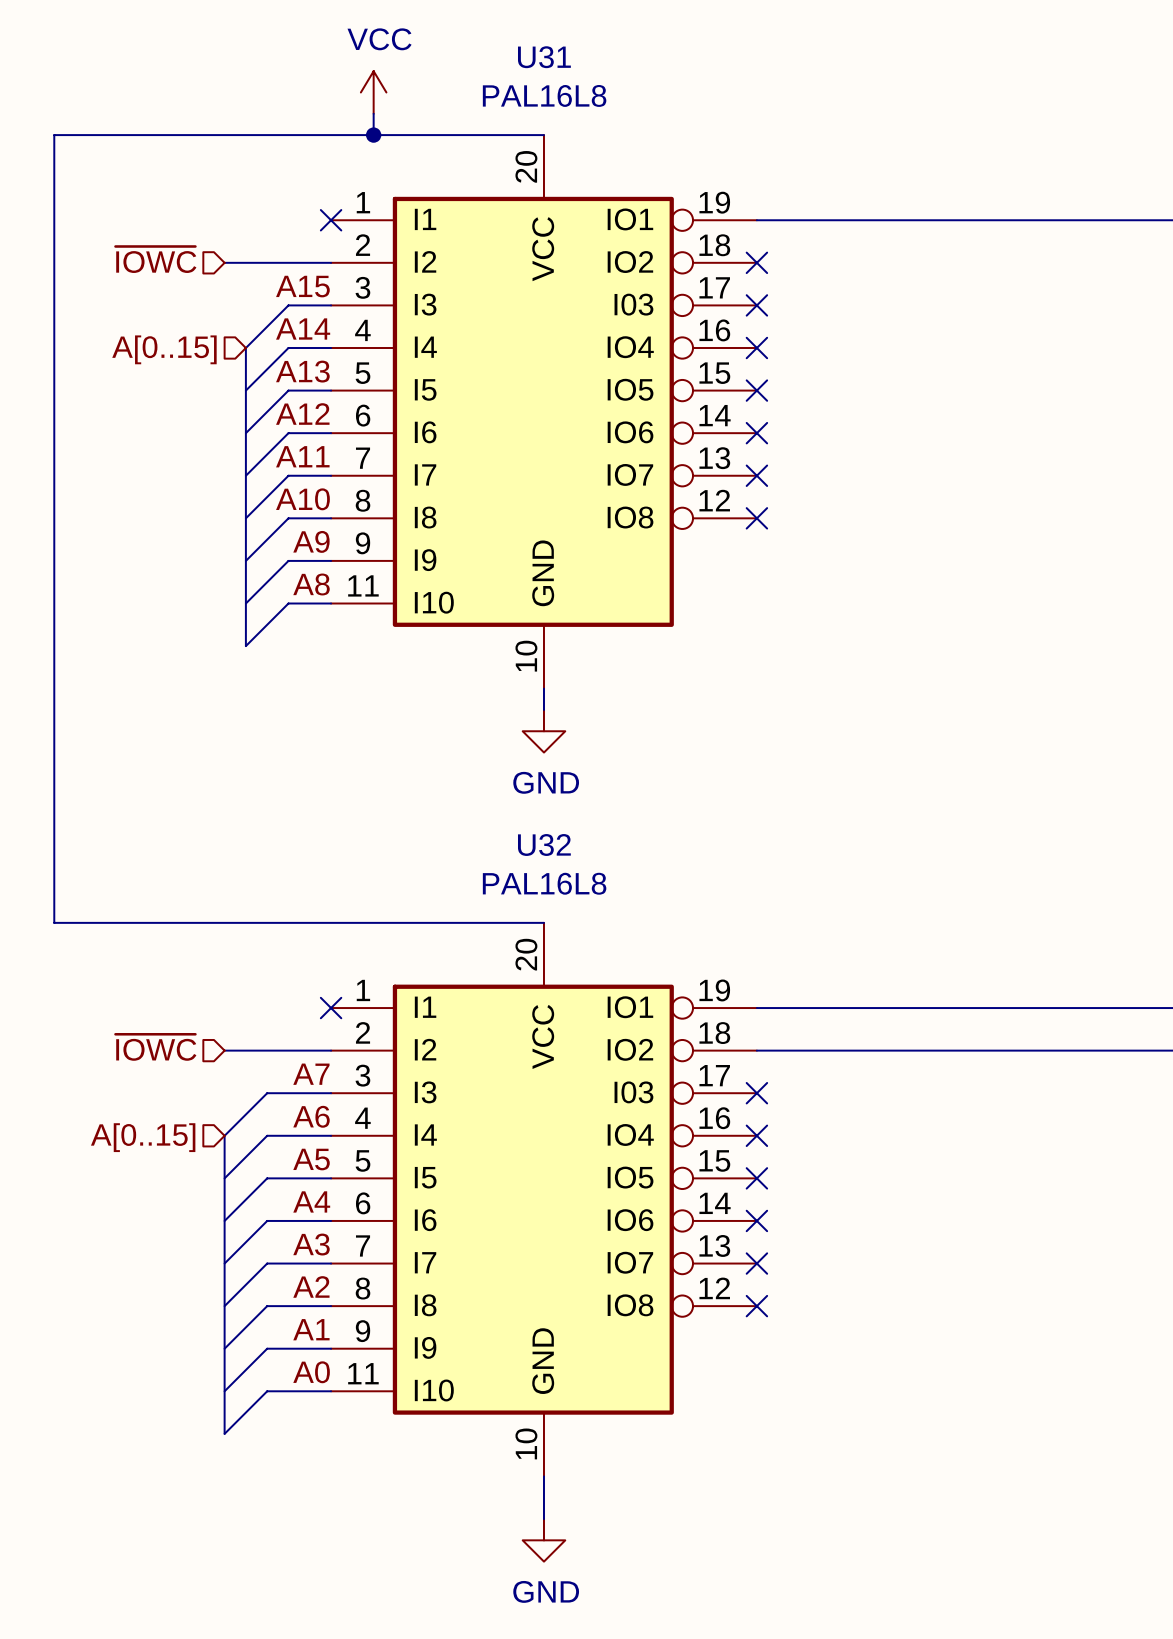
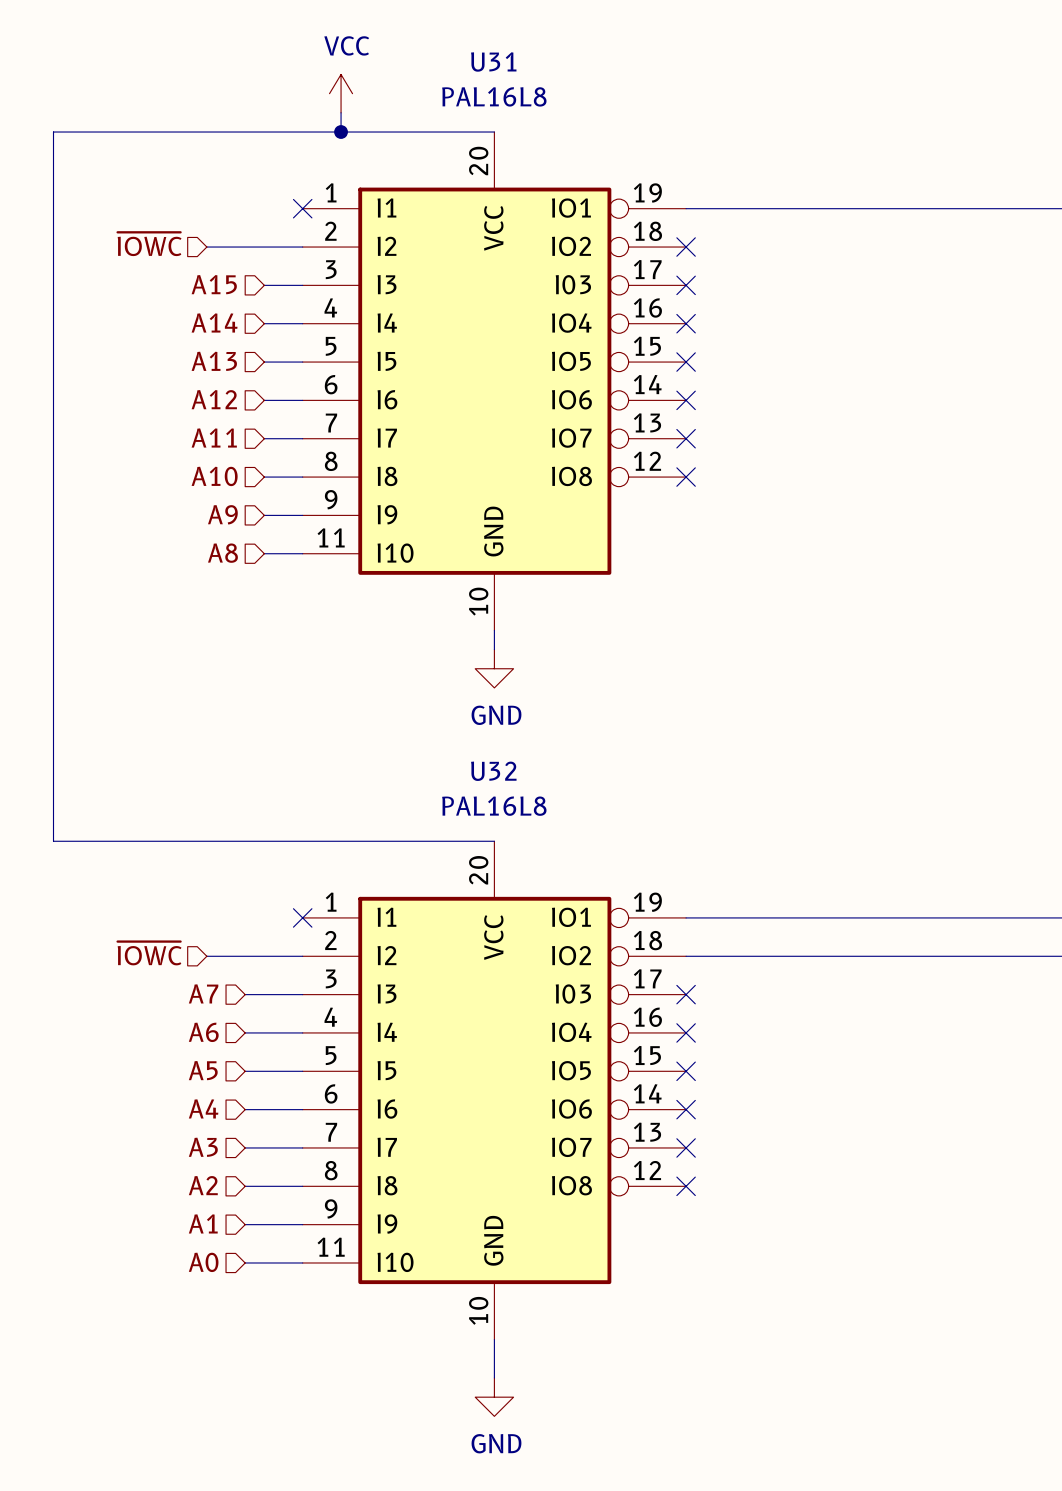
label: A15 (302, 286) -> none
hierarchical label: none -> A15 (214, 284)
wire: (288, 305) (245, 348) -> none
label: A14 (303, 329) -> none
hierarchical label: none -> A14 (214, 322)
bus: (245, 348) (245, 646) -> none
wire: (288, 348) (245, 390) -> none
hierarchical label: A[0..15] (164, 349) -> none
label: A13 (302, 371) -> none
hierarchical label: none -> A13 (214, 361)
wire: (288, 390) (245, 433) -> none
label: A12 (302, 414) -> none
hierarchical label: none -> A12 (214, 399)
wire: (288, 433) (245, 475) -> none
label: A11 (302, 456) -> none
hierarchical label: none -> A11 (214, 438)
wire: (288, 475) (245, 518) -> none
label: A10 (302, 499) -> none
hierarchical label: none -> A10 (214, 476)
wire: (288, 518) (245, 560) -> none
label: A9 (311, 541) -> none
hierarchical label: none -> A9 (222, 514)
wire: (288, 560) (245, 603) -> none
label: A8 (311, 584) -> none
hierarchical label: none -> A8 (222, 553)
wire: (288, 603) (245, 646) -> none
label: A7 (311, 1074) -> none
hierarchical label: none -> A7 (203, 993)
wire: (267, 1093) (224, 1135) -> none
label: A6 (311, 1116) -> none
hierarchical label: none -> A6 (203, 1032)
bus: (224, 1135) (224, 1433) -> none
wire: (267, 1135) (224, 1178) -> none
hierarchical label: A[0..15] (143, 1137) -> none
label: A5 (311, 1159) -> none
hierarchical label: none -> A5 (203, 1070)
wire: (267, 1178) (224, 1220) -> none
label: A4 (311, 1201) -> none
hierarchical label: none -> A4 (203, 1108)
wire: (267, 1220) (224, 1263) -> none
label: A3 (311, 1244) -> none
hierarchical label: none -> A3 (203, 1147)
wire: (267, 1263) (224, 1306) -> none
label: A2 (311, 1286) -> none
hierarchical label: none -> A2 (203, 1185)
wire: (267, 1306) (224, 1348) -> none
label: A1 (311, 1329) -> none
hierarchical label: none -> A1 (203, 1223)
wire: (267, 1348) (224, 1391) -> none
label: A0 (311, 1372) -> none
hierarchical label: none -> A0 (203, 1262)
wire: (267, 1391) (224, 1433) -> none

